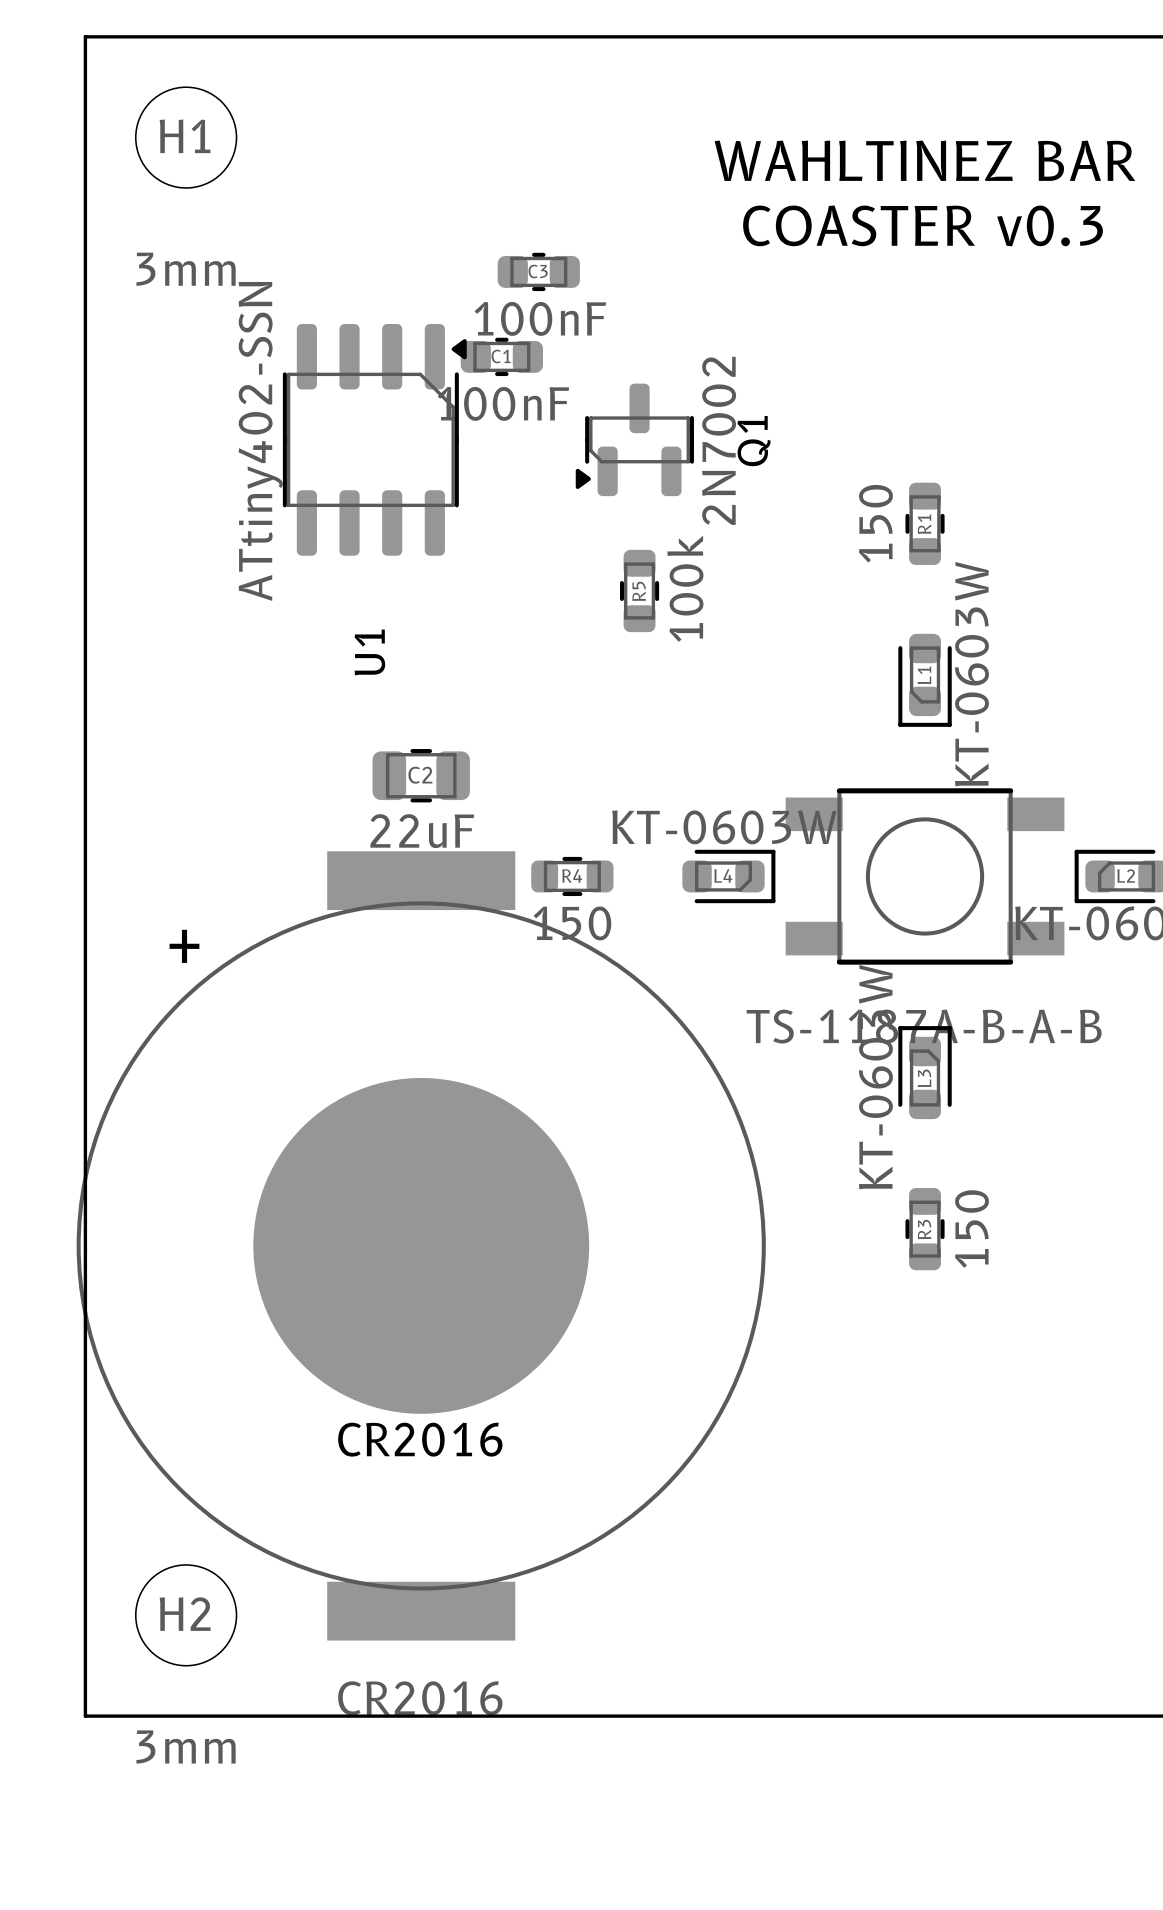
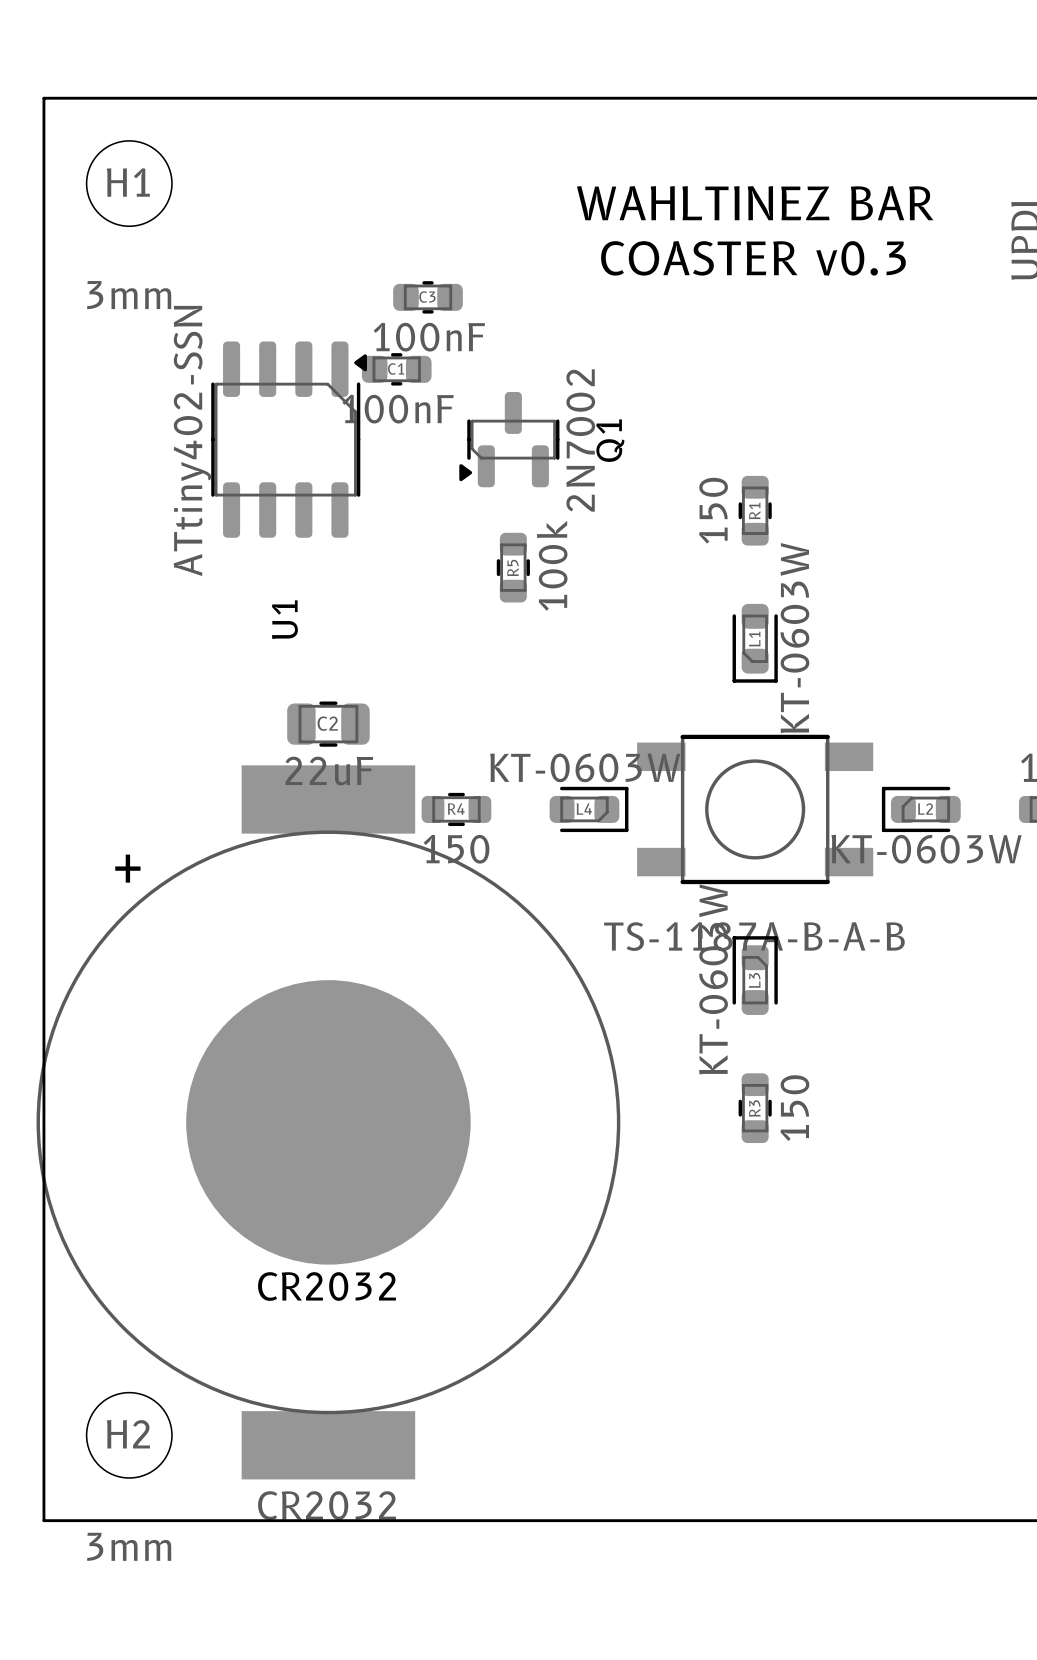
part footprint: [76, 851, 766, 1641] -> [36, 765, 621, 1480]
part value: CR2016 (420, 1698) -> CR2032 (326, 1505)

